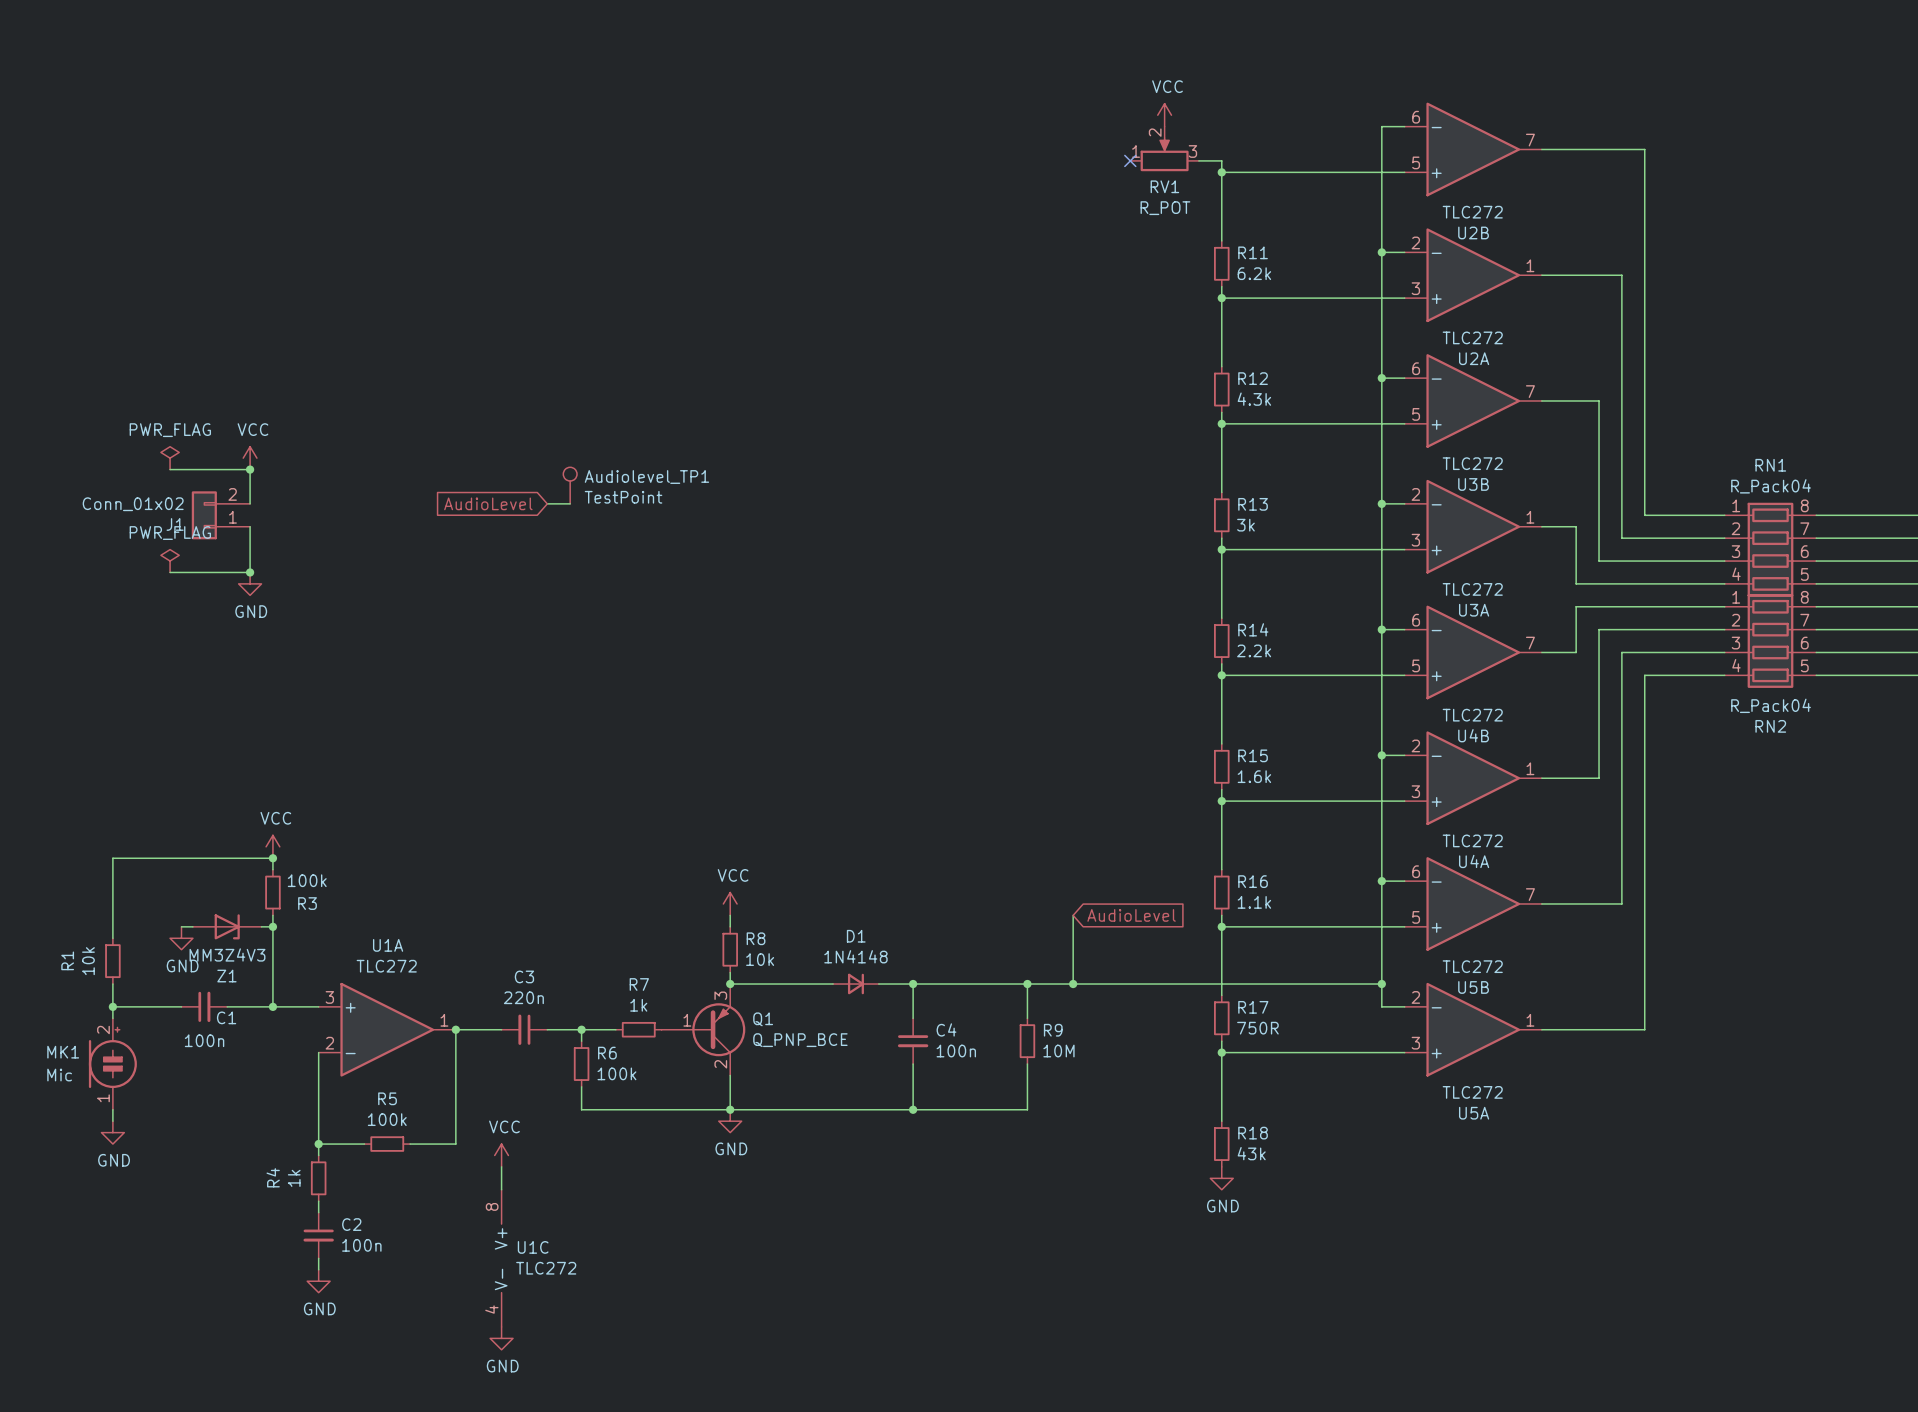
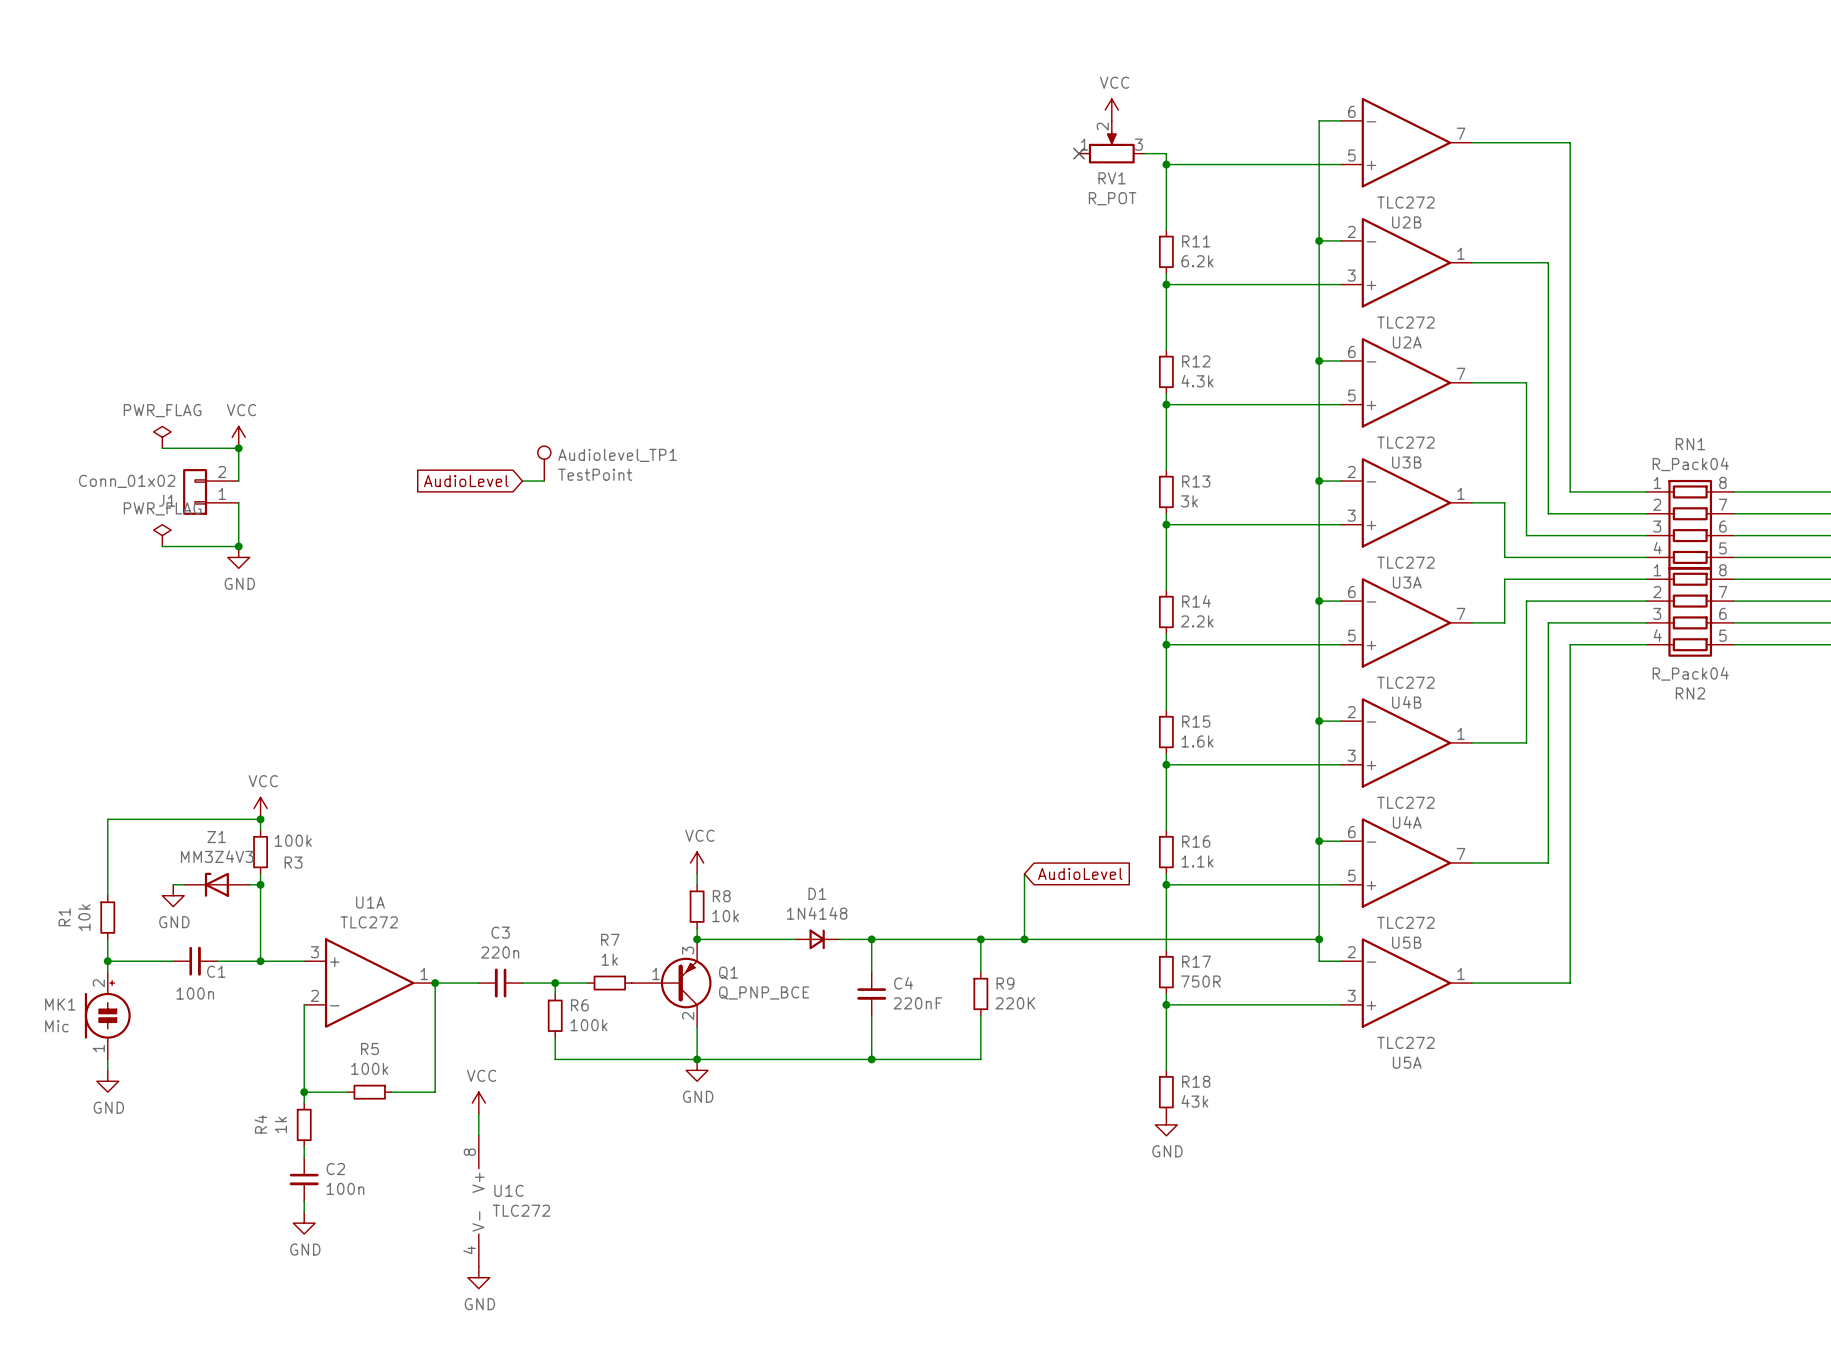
Z1 rotation: 0° (227, 926) -> 180° (216, 884)
C4 value: 100n (956, 1051) -> 220nF (917, 1003)
R9 value: 10M (1058, 1051) -> 220K (1015, 1003)

